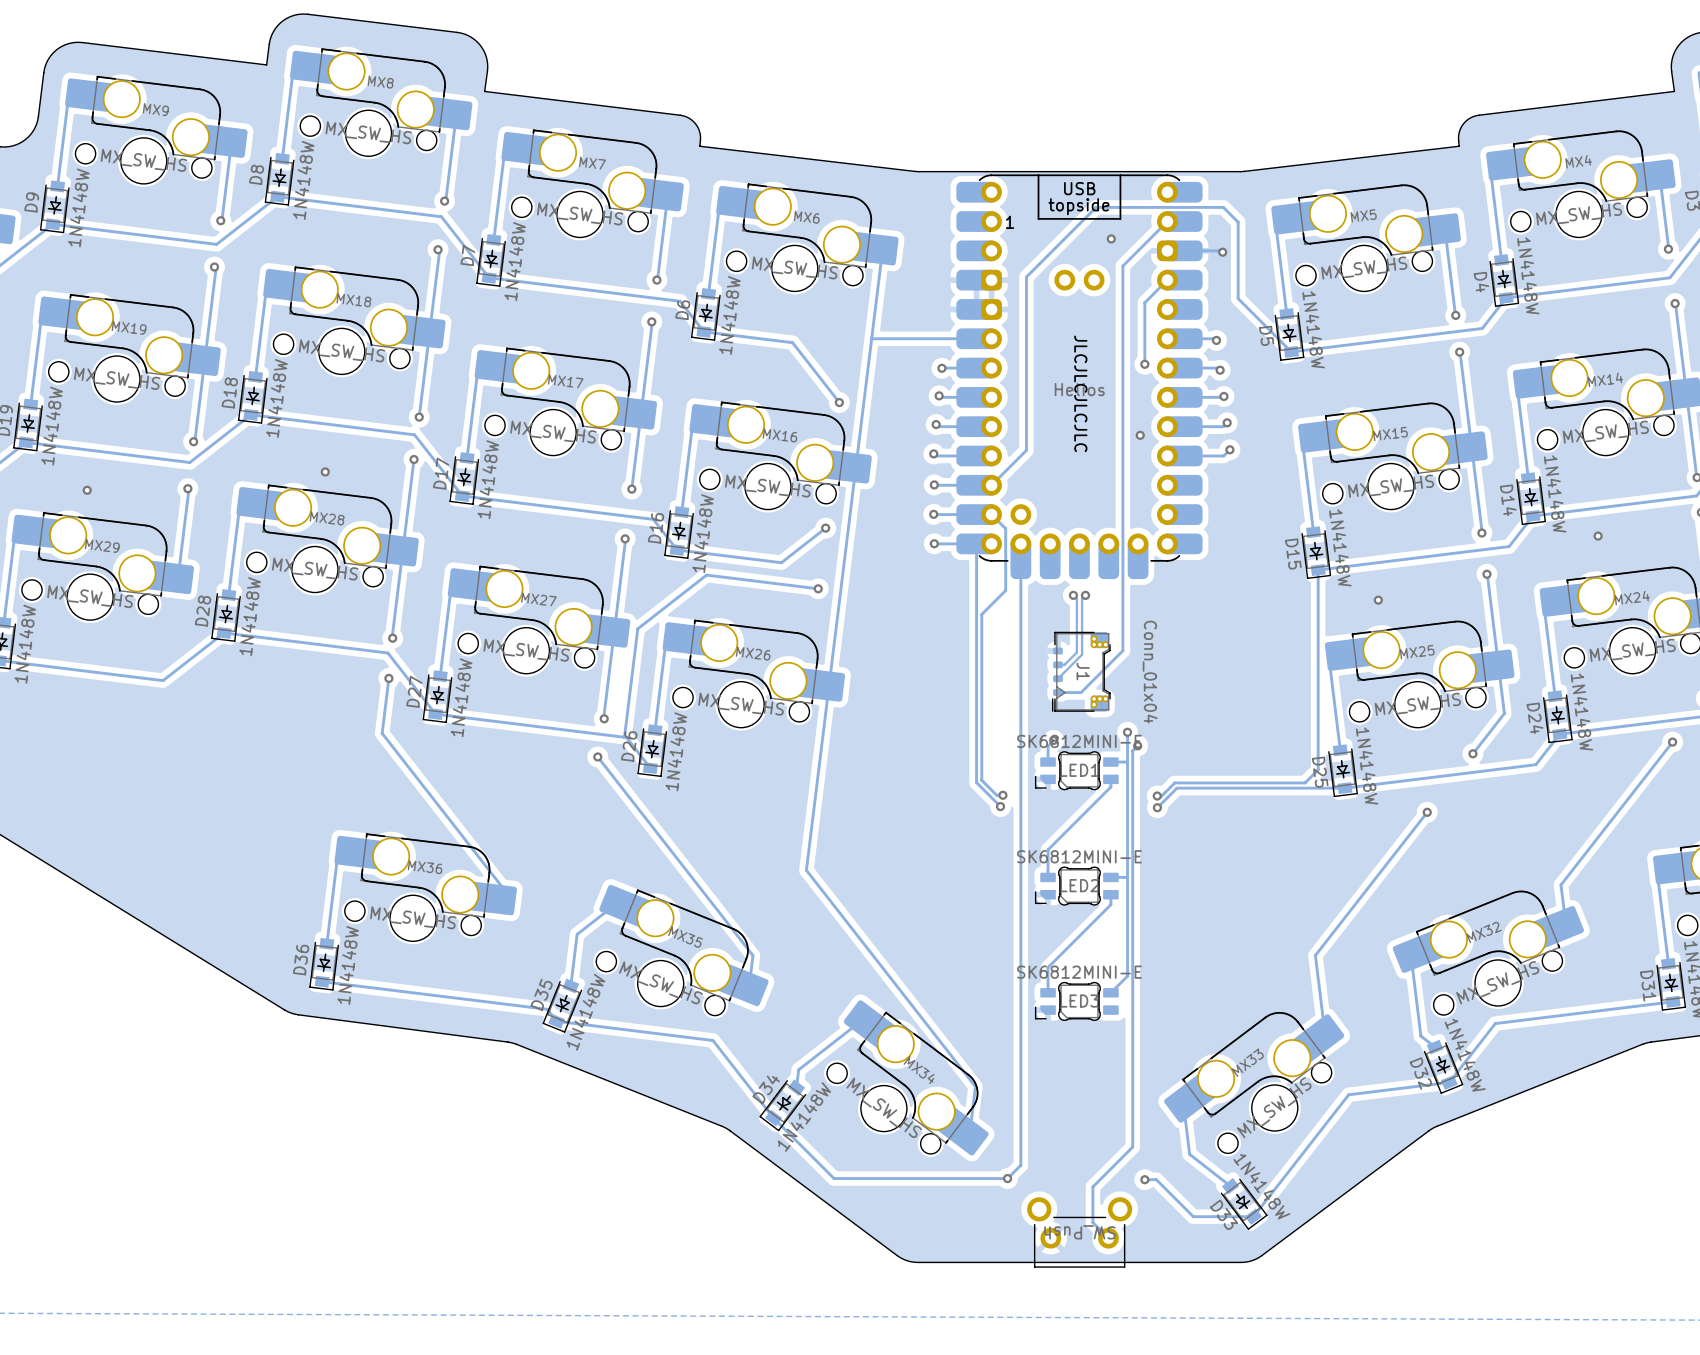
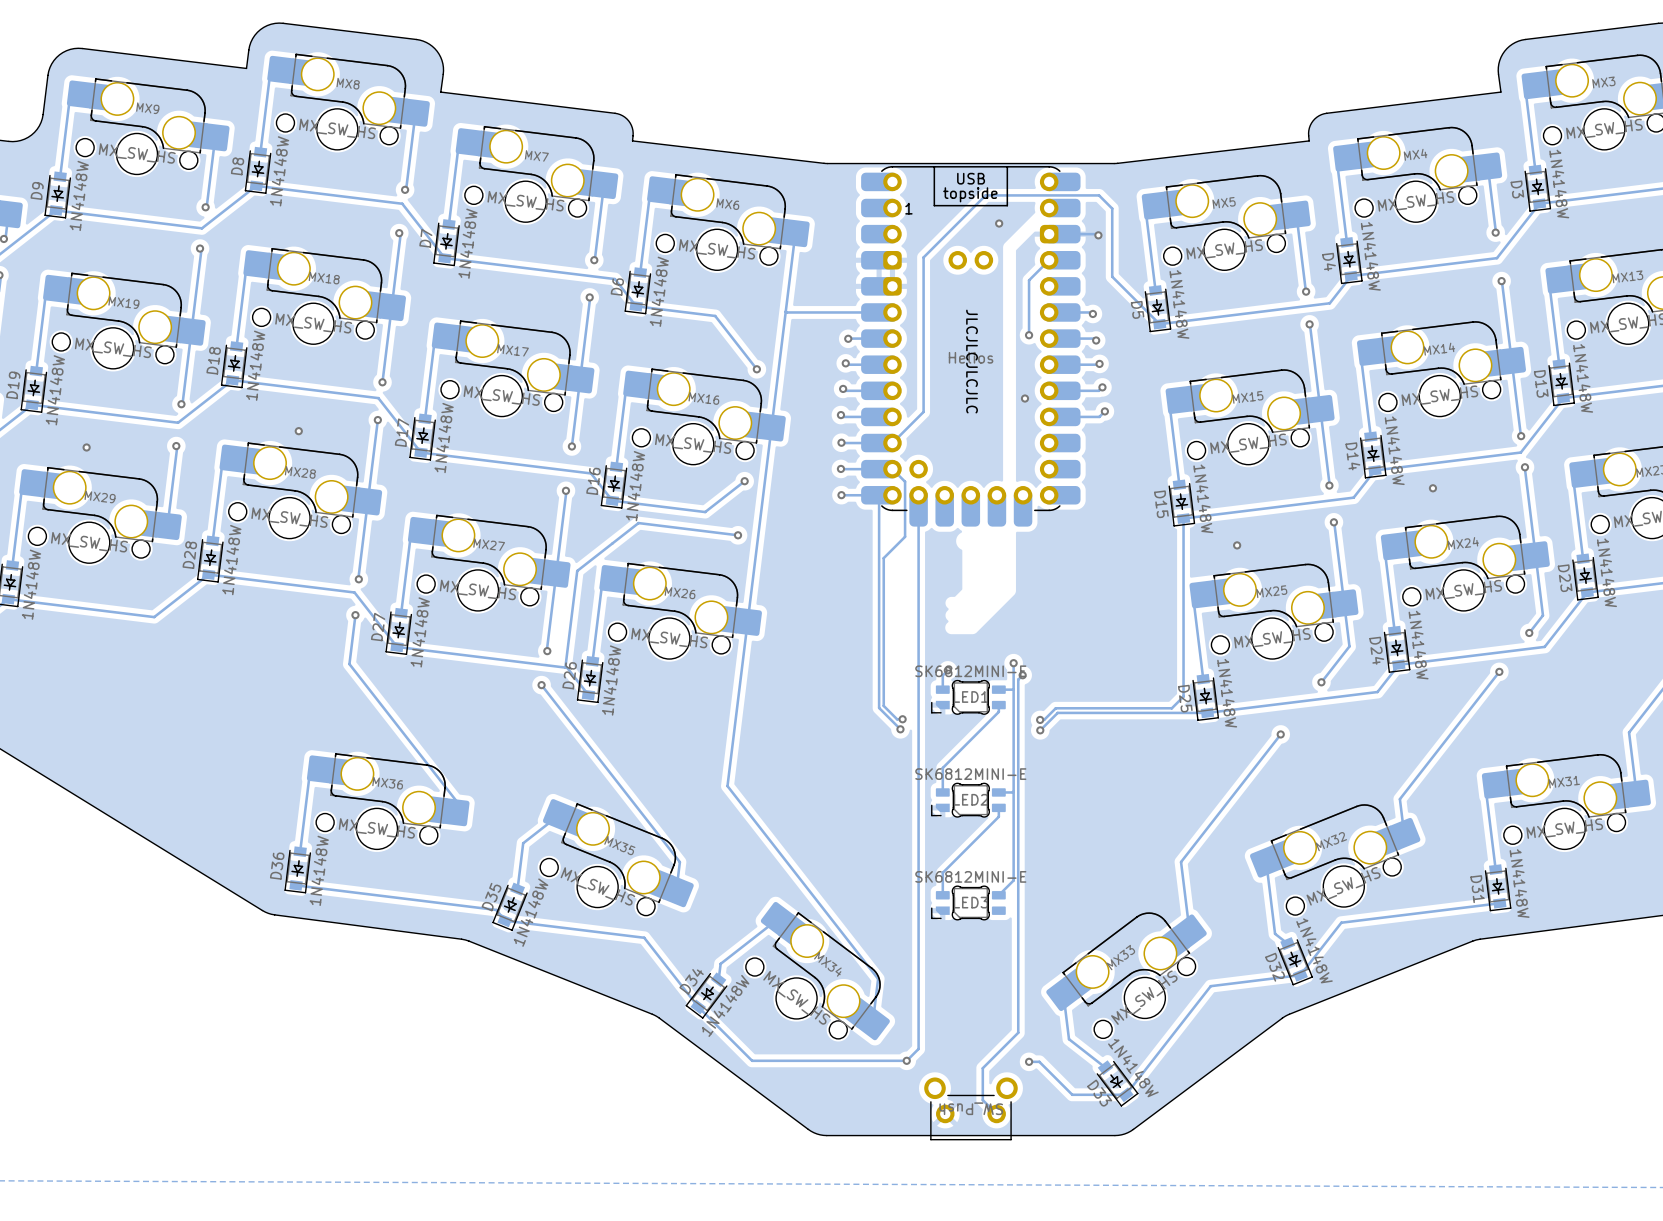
track: (1167, 221) (1122, 266) (1122, 650) (1081, 692) (1058, 692) -> none
track: (1073, 595) (1076, 598) (1076, 652) (1064, 664) (1058, 664) -> none
via: (1073, 595) -> none
track: (1085, 595) (1082, 598) (1082, 654) (1058, 678) -> none
via: (1085, 595) -> none
J1: Conn_01x04 (1081, 671) -> none

